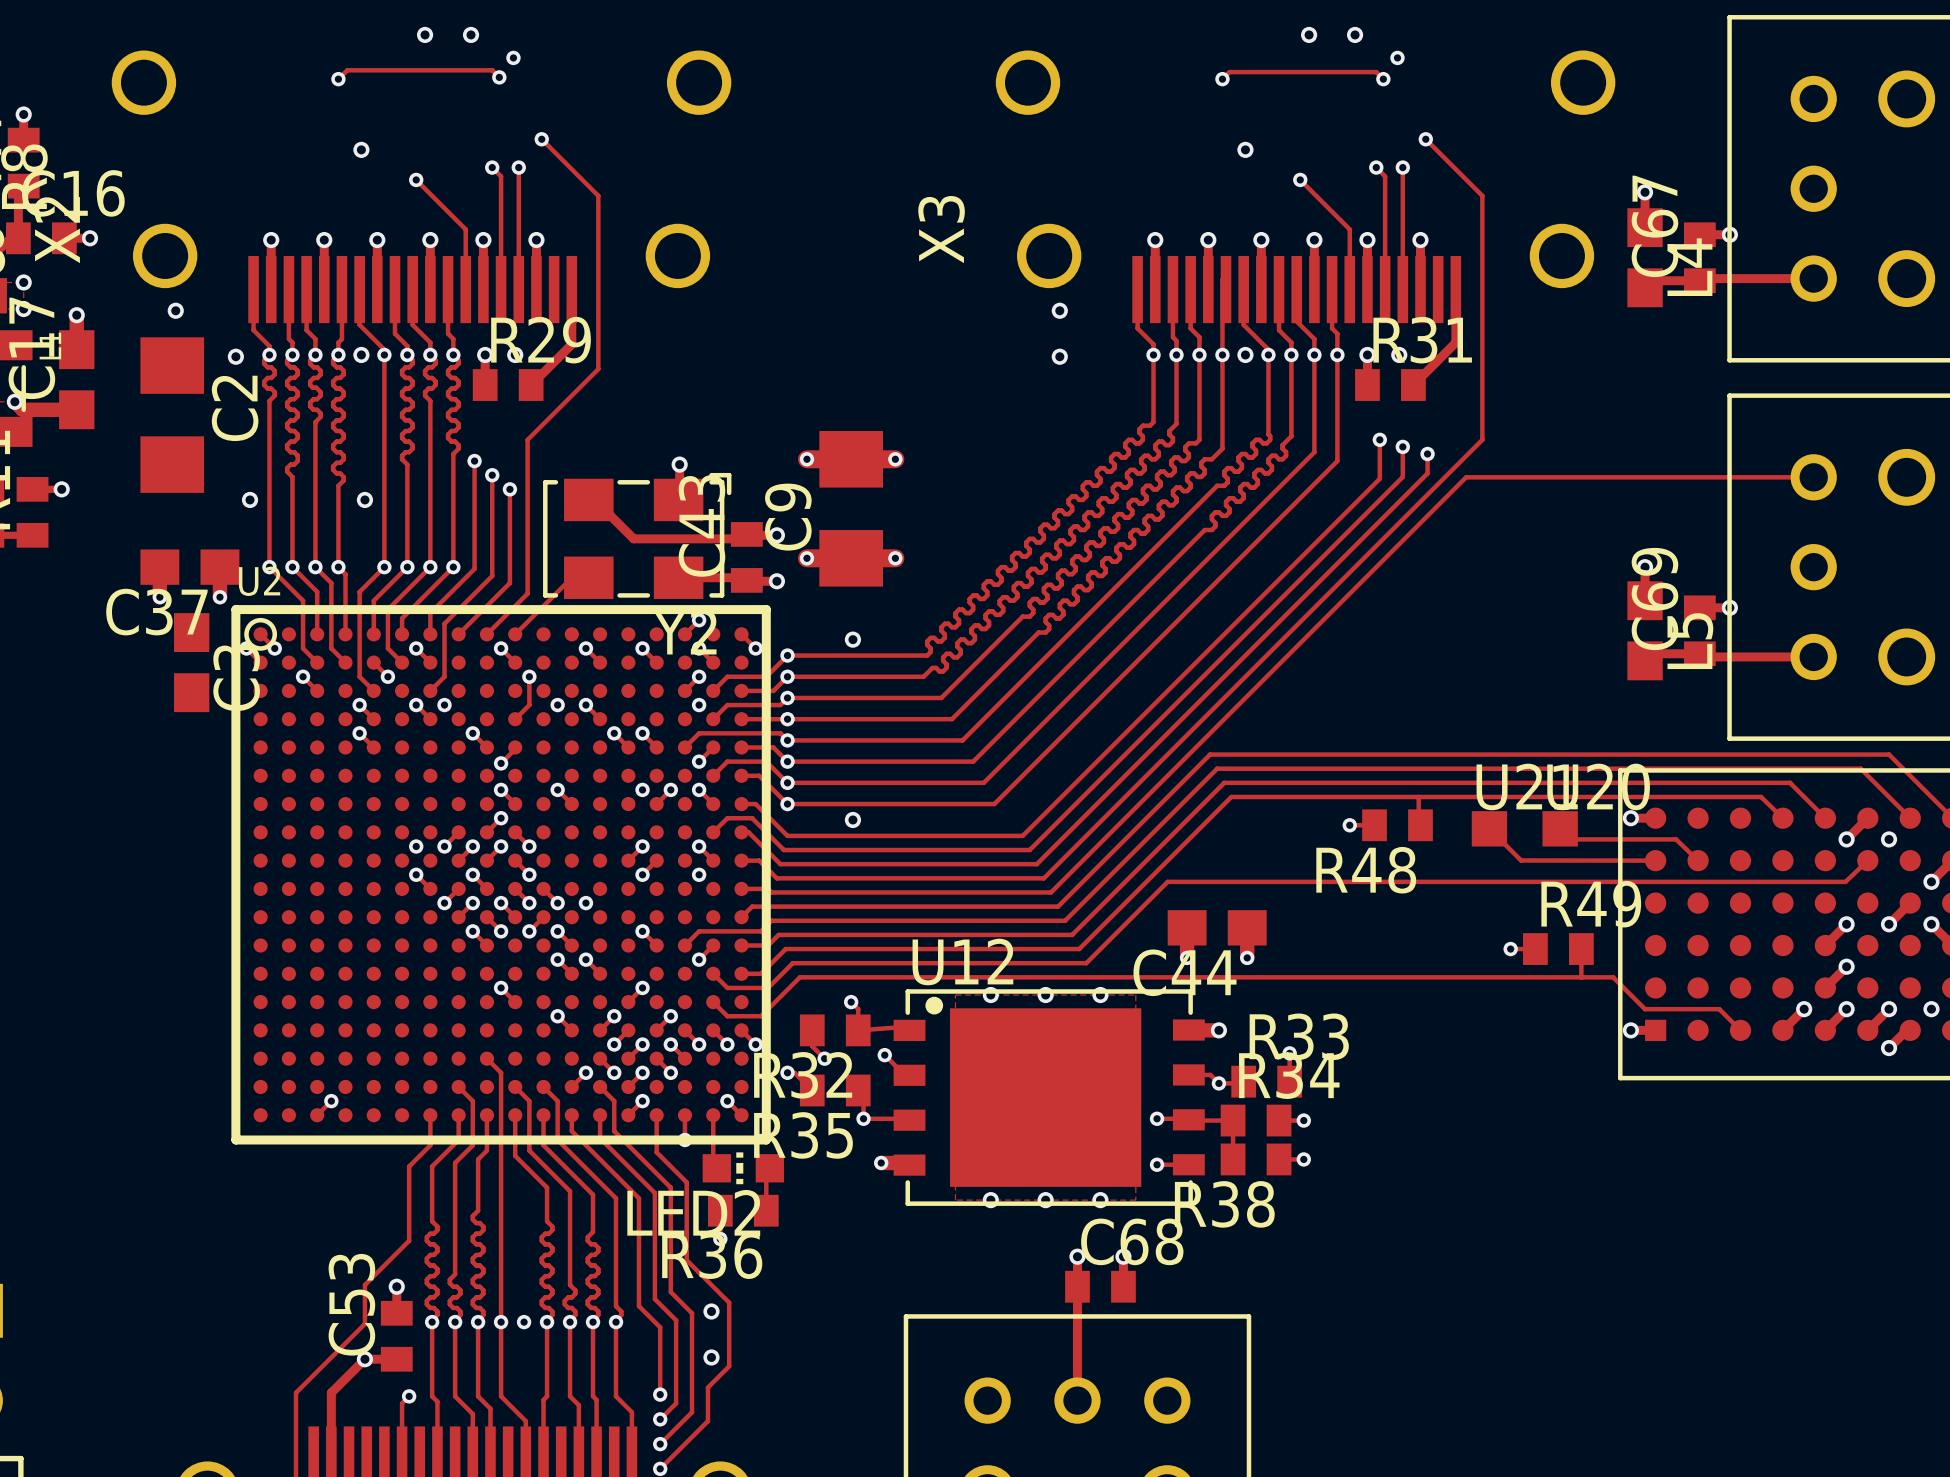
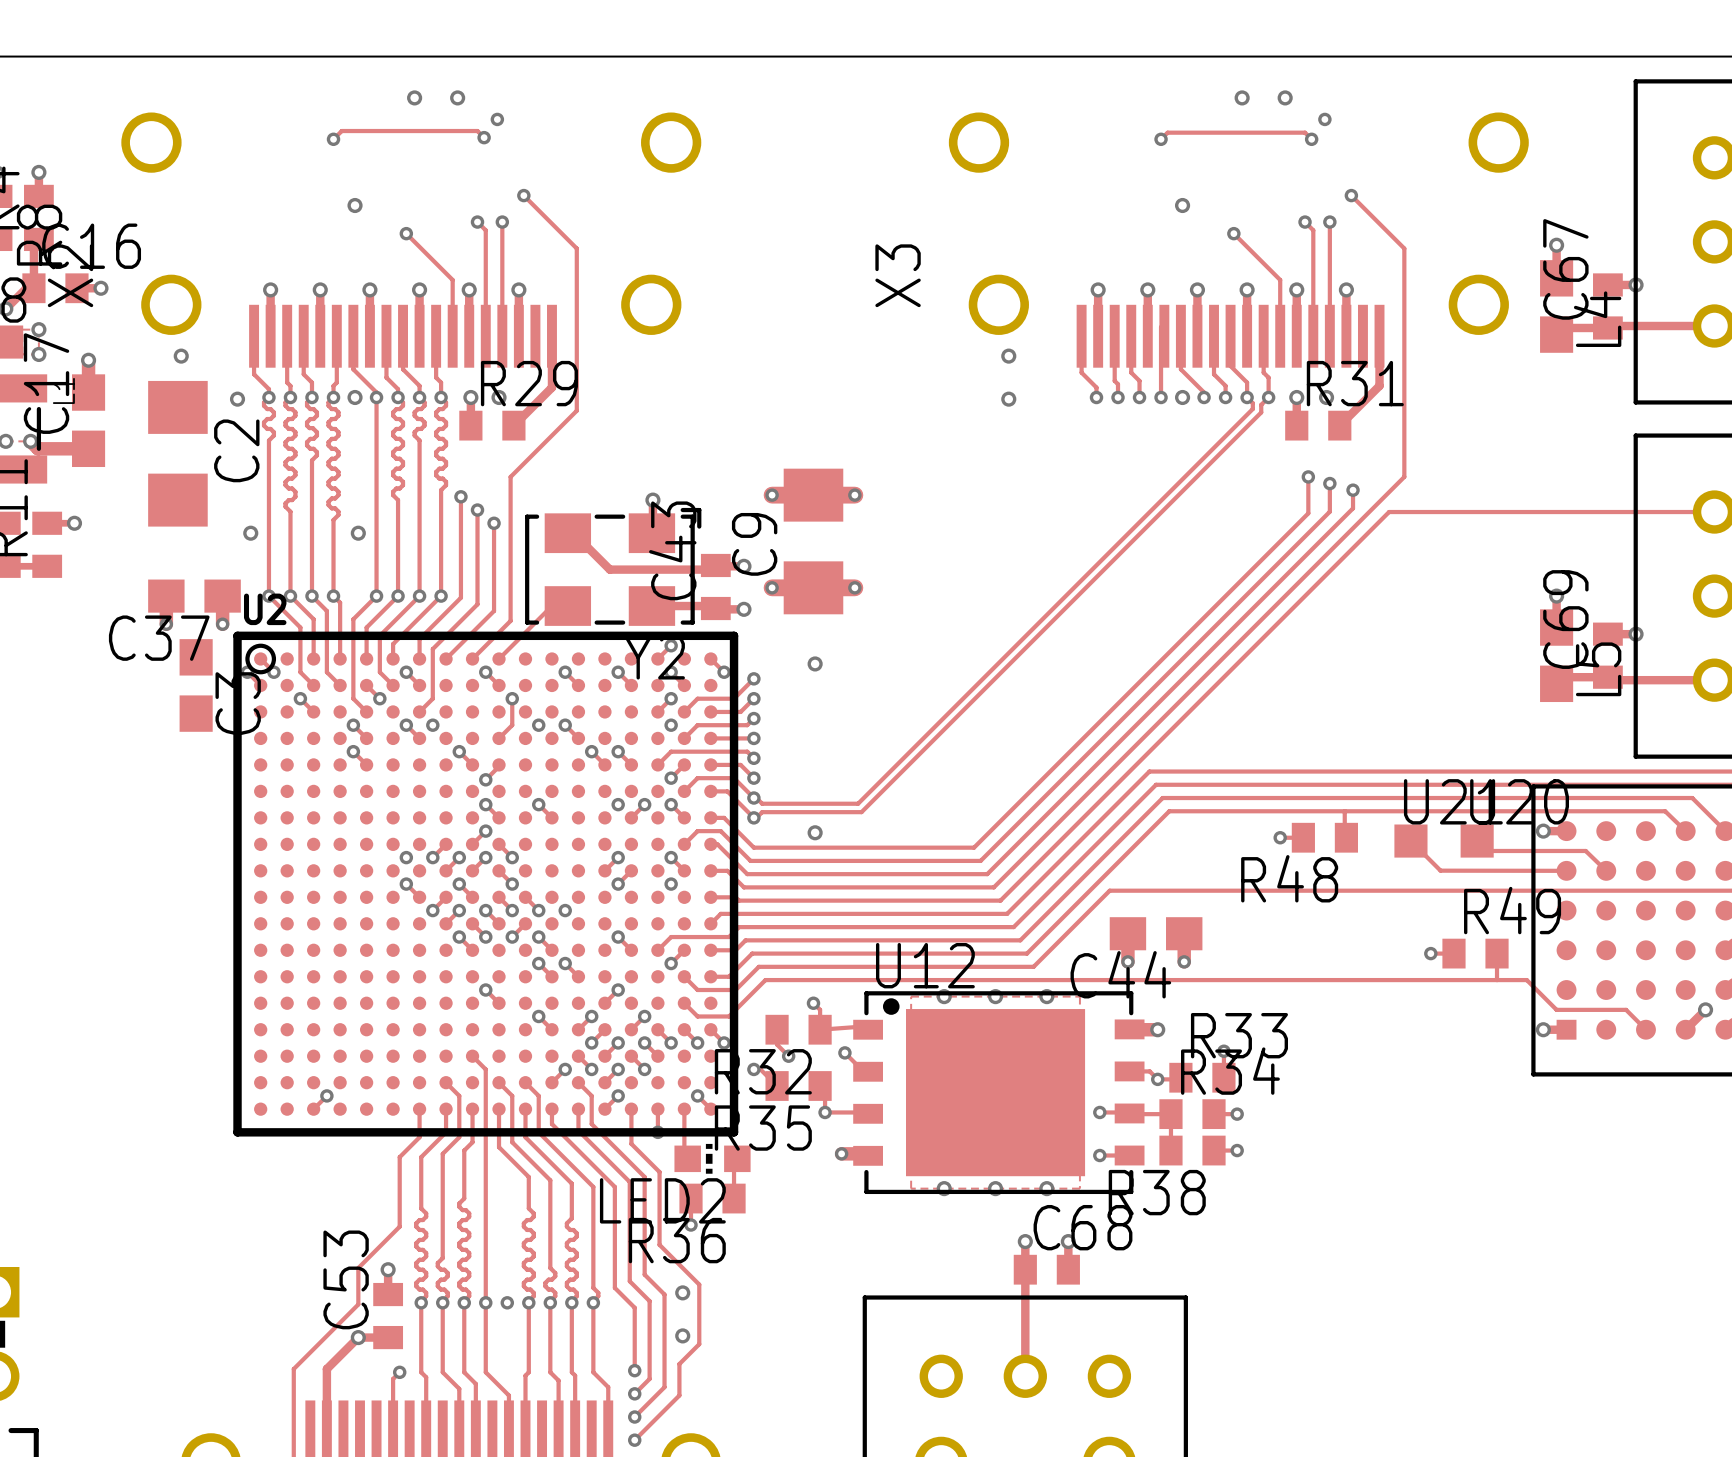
track: (1153, 354) (1153, 422) (1149, 425) (1142, 425) (1139, 429) (1142, 439) (1139, 443) (1128, 439) (1125, 443) (1125, 446) (1128, 450) (1128, 453) (1125, 457) (1114, 453) (1111, 457) (1111, 461) (1114, 464) (1114, 468) (1111, 471) (1100, 468) (1096, 471) (1100, 482) (1096, 485) (1086, 482) (1082, 485) (1082, 489) (1086, 492) (1086, 496) (1082, 499) (1079, 499) (1075, 496) (1072, 496) (1068, 499) (1072, 510) (1068, 514) (1058, 510) (1054, 514) (1054, 517) (1058, 521) (1058, 524) (1054, 528) (1043, 524) (1040, 528) (1043, 538) (1040, 542) (1036, 542) (1033, 538) (1029, 538) (1026, 542) (1026, 545) (1029, 549) (1029, 553) (1026, 556) (1015, 553) (1012, 556) (1012, 560) (1015, 563) (1015, 567) (1012, 570) (1008, 570) (1004, 567) (1001, 567) (997, 570) (1001, 581) (997, 584) (987, 581) (983, 584) (983, 588) (987, 591) (987, 595) (983, 598) (973, 595) (969, 598) (973, 609) (969, 613) (966, 613) (962, 609) (959, 609) (955, 613) (955, 616) (959, 620) (959, 623) (955, 627) (944, 623) (941, 627) (944, 637) (941, 641) (937, 641) (934, 637) (930, 637) (927, 641) (927, 644) (930, 648) (930, 652) (927, 655) (787, 655) -> none
track: (1176, 354) (1176, 423) (1169, 431) (1172, 441) (1169, 445) (1158, 441) (1155, 445) (1155, 448) (1158, 452) (1158, 455) (1155, 459) (1144, 455) (1141, 459) (1144, 469) (1141, 473) (1130, 469) (1126, 473) (1130, 484) (1126, 487) (1123, 487) (1119, 484) (1116, 484) (1112, 487) (1116, 498) (1112, 501) (1102, 498) (1098, 501) (1098, 505) (1102, 508) (1102, 512) (1098, 515) (1088, 512) (1084, 515) (1084, 519) (1088, 522) (1088, 526) (1084, 530) (1073, 526) (1070, 530) (1073, 540) (1070, 544) (1059, 540) (1056, 544) (1059, 554) (1056, 558) (1052, 558) (1049, 554) (1045, 554) (1042, 558) (1045, 568) (1042, 572) (1031, 568) (1027, 572) (1027, 575) (1031, 579) (1031, 583) (1027, 586) (1017, 583) (1013, 586) (1013, 590) (1017, 593) (1017, 597) (1013, 600) (1003, 597) (999, 600) (1003, 611) (999, 614) (989, 611) (985, 614) (985, 618) (989, 621) (989, 625) (985, 629) (982, 629) (978, 625) (974, 625) (971, 629) (974, 639) (971, 643) (960, 639) (957, 643) (957, 646) (960, 650) (960, 653) (957, 657) (953, 657) (950, 653) (946, 653) (943, 657) (943, 660) (946, 664) (946, 667) (943, 671) (932, 667) (923, 676) (787, 676) -> none
track: (1199, 354) (1199, 439) (1195, 443) (1188, 443) (1185, 446) (1188, 457) (1185, 461) (1174, 457) (1171, 461) (1174, 471) (1171, 475) (1160, 471) (1157, 475) (1160, 485) (1157, 489) (1146, 485) (1142, 489) (1146, 499) (1142, 503) (1132, 499) (1128, 503) (1132, 514) (1128, 517) (1118, 514) (1114, 517) (1118, 528) (1114, 531) (1104, 528) (1100, 531) (1104, 542) (1100, 545) (1089, 542) (1086, 545) (1089, 556) (1086, 560) (1075, 556) (1072, 560) (1075, 570) (1072, 574) (1061, 570) (1058, 574) (1061, 584) (1058, 588) (1047, 584) (1043, 588) (1047, 598) (1043, 602) (1033, 598) (1029, 602) (1033, 613) (1029, 616) (1022, 616) (941, 697) (787, 697) -> none
track: (1222, 354) (1222, 448) (1211, 459) (1204, 459) (1201, 462) (1204, 473) (1201, 476) (1190, 473) (1187, 476) (1190, 487) (1187, 491) (1176, 487) (1172, 491) (1176, 501) (1172, 505) (1162, 501) (1158, 505) (1162, 515) (1158, 519) (1148, 515) (1144, 519) (1148, 530) (1144, 533) (1134, 530) (1130, 533) (1134, 544) (1130, 547) (1119, 544) (1116, 547) (1119, 558) (1116, 561) (1105, 558) (1102, 561) (1105, 572) (1102, 575) (1091, 572) (1088, 575) (1091, 586) (1088, 590) (1077, 586) (1073, 590) (1077, 600) (1073, 604) (1063, 600) (1059, 604) (1063, 614) (1059, 618) (1049, 614) (1045, 618) (1049, 629) (1045, 632) (1038, 632) (951, 719) (787, 719) -> none
track: (1268, 354) (1268, 434) (1270, 439) (1266, 443) (1256, 439) (1252, 443) (1256, 453) (1252, 457) (1241, 453) (1238, 457) (1241, 468) (1238, 471) (1227, 468) (1224, 471) (1227, 482) (1224, 485) (1217, 485) (962, 740) (787, 740) -> none
track: (1291, 354) (1291, 436) (1282, 445) (1286, 455) (1282, 459) (1271, 455) (1268, 459) (1271, 469) (1268, 473) (1257, 469) (1254, 473) (1257, 484) (1254, 487) (1243, 484) (1240, 487) (1243, 498) (1240, 501) (1229, 498) (1226, 501) (1229, 512) (1226, 515) (1215, 512) (1211, 515) (1215, 526) (1211, 530) (1204, 530) (973, 761) (787, 761) -> none
track: (1314, 354) (1314, 452) (983, 782) (790, 782) -> (1247, 397) (1252, 403) (1252, 408) (858, 803) (762, 803) (756, 798)
track: (1337, 354) (1337, 461) (994, 804) (790, 804) -> (1268, 397) (1261, 404) (1261, 412) (861, 812) (762, 812) (756, 817)

